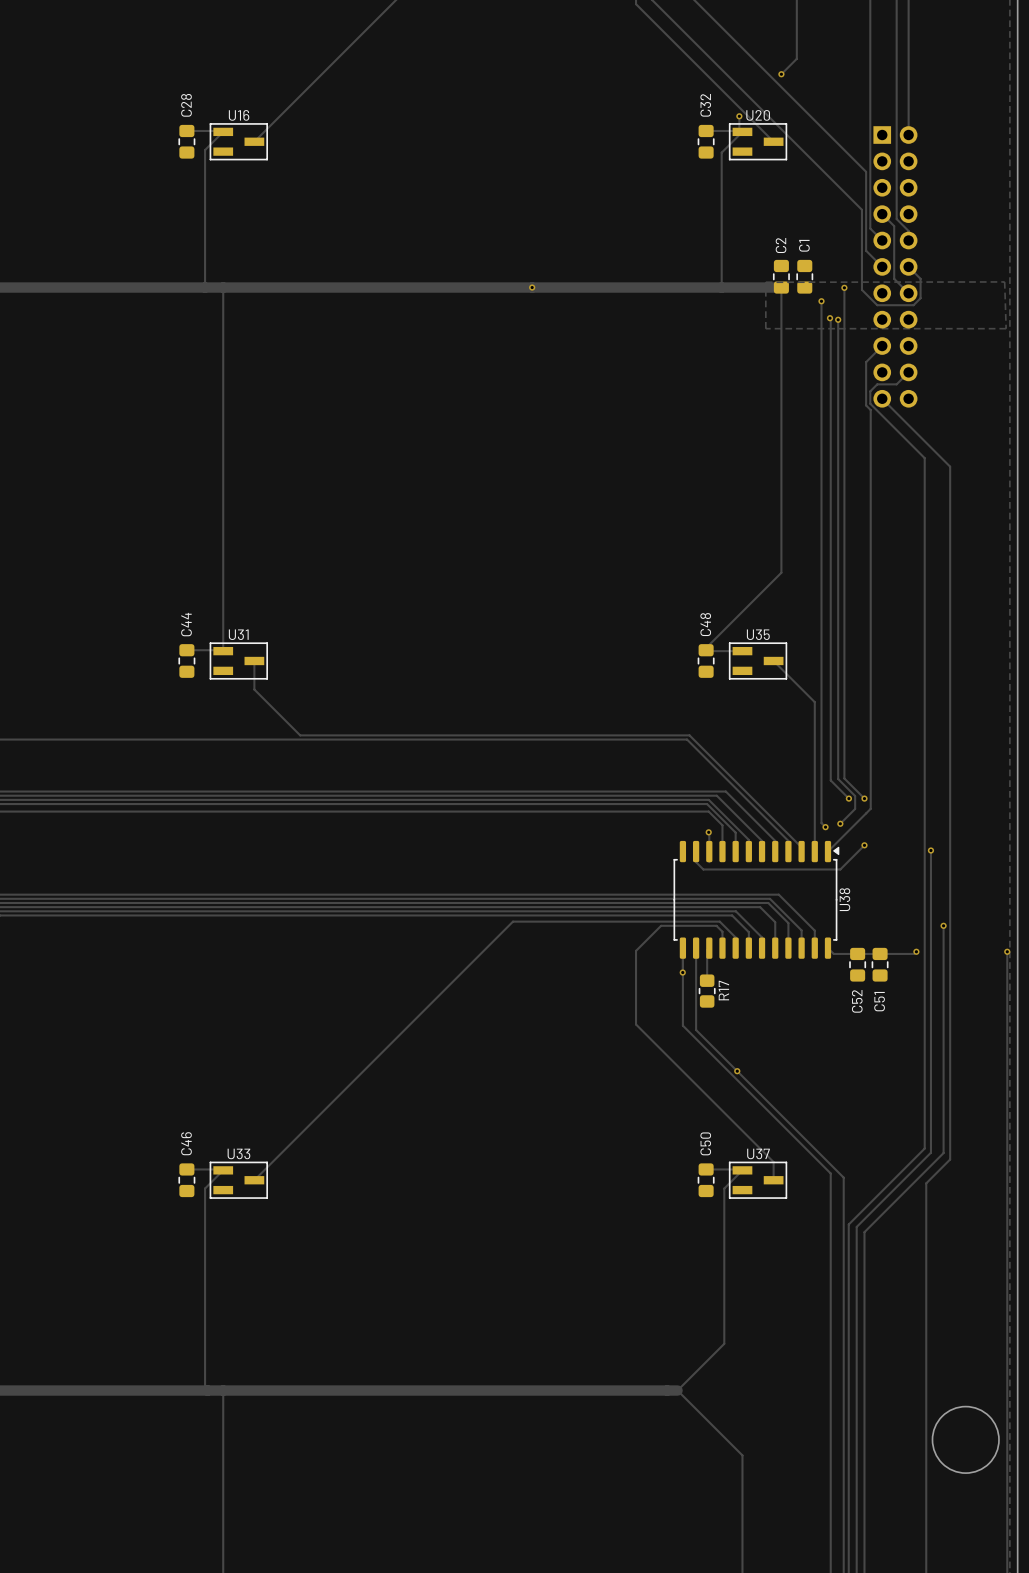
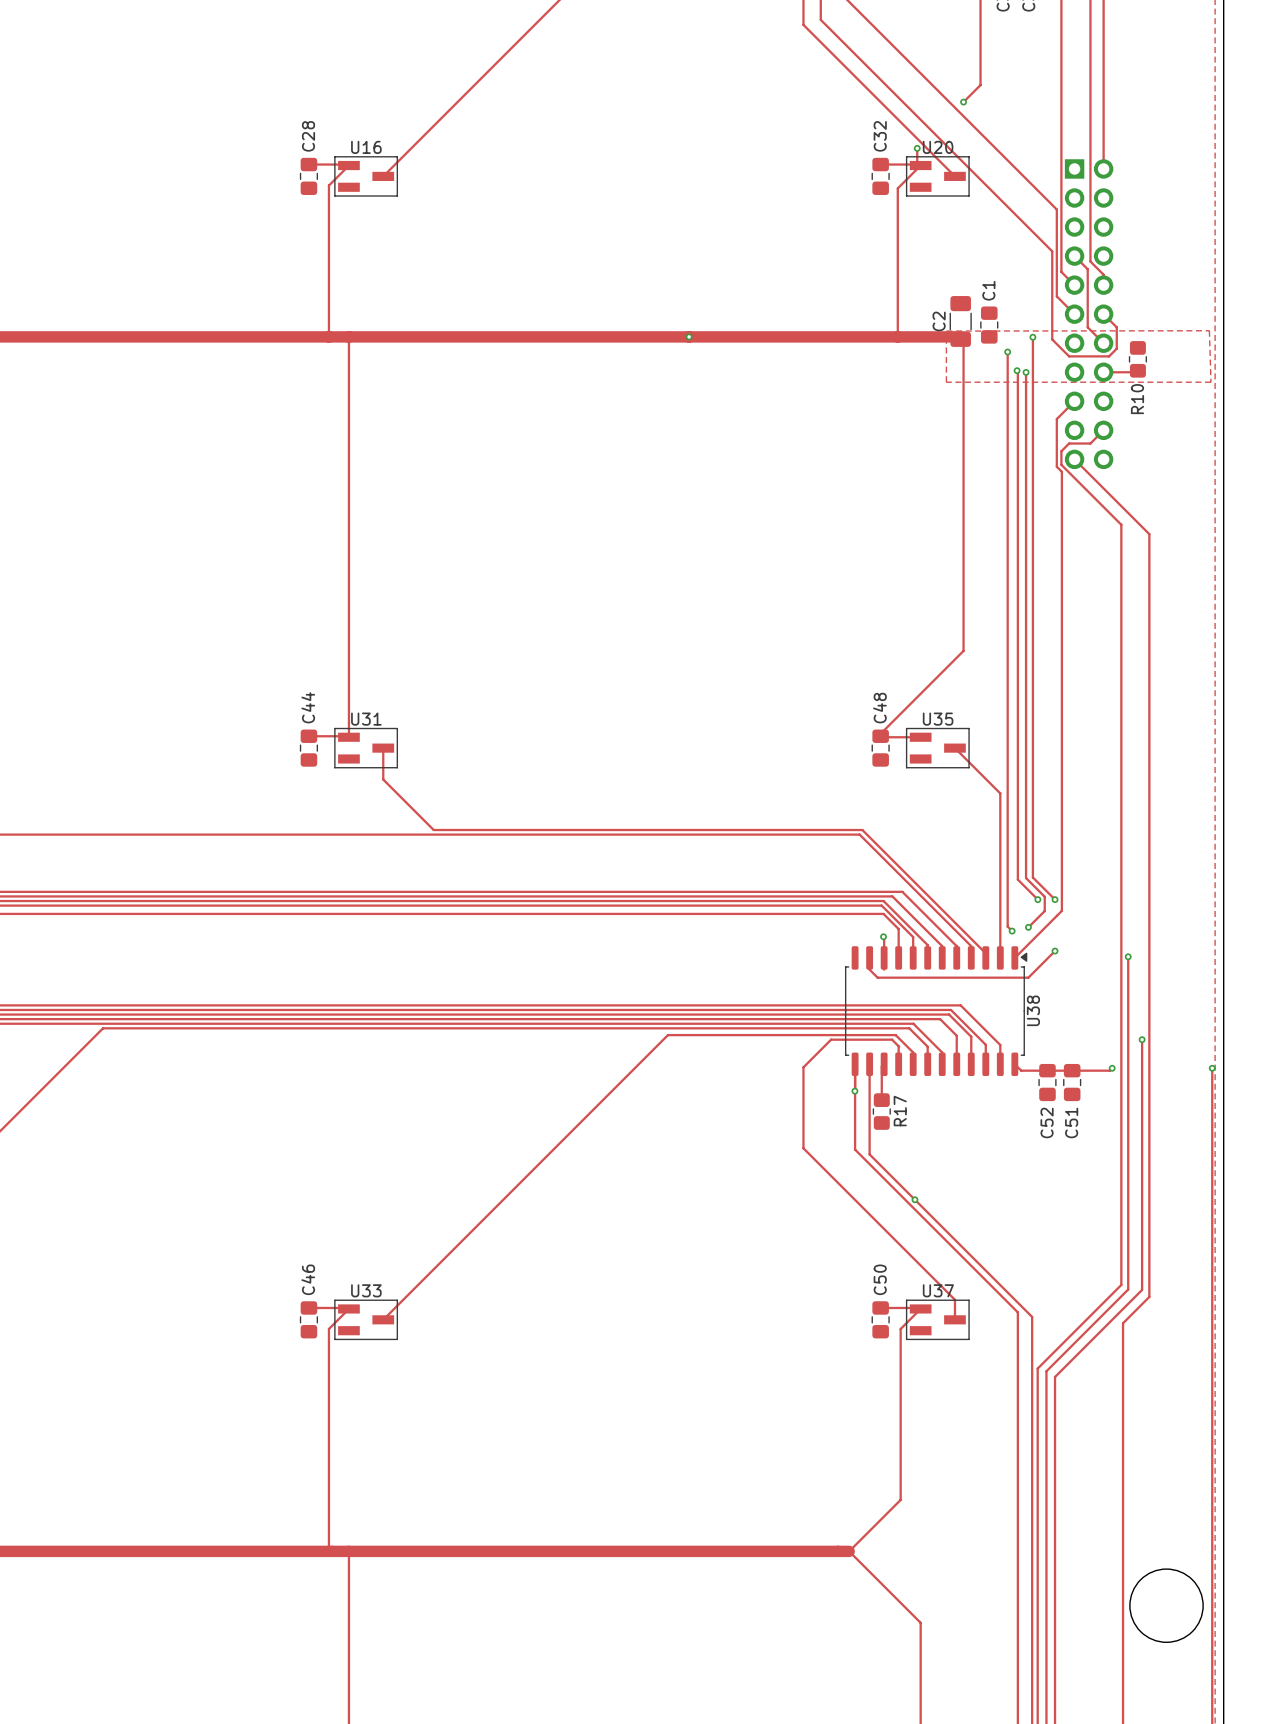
C2 name position: C2 (781, 245) -> C2 (939, 321)
C2 footprint: [773, 259, 790, 294] -> [949, 296, 972, 347]
R10: none -> (1137, 359)
track: none -> (1137, 370) (1103, 372)

